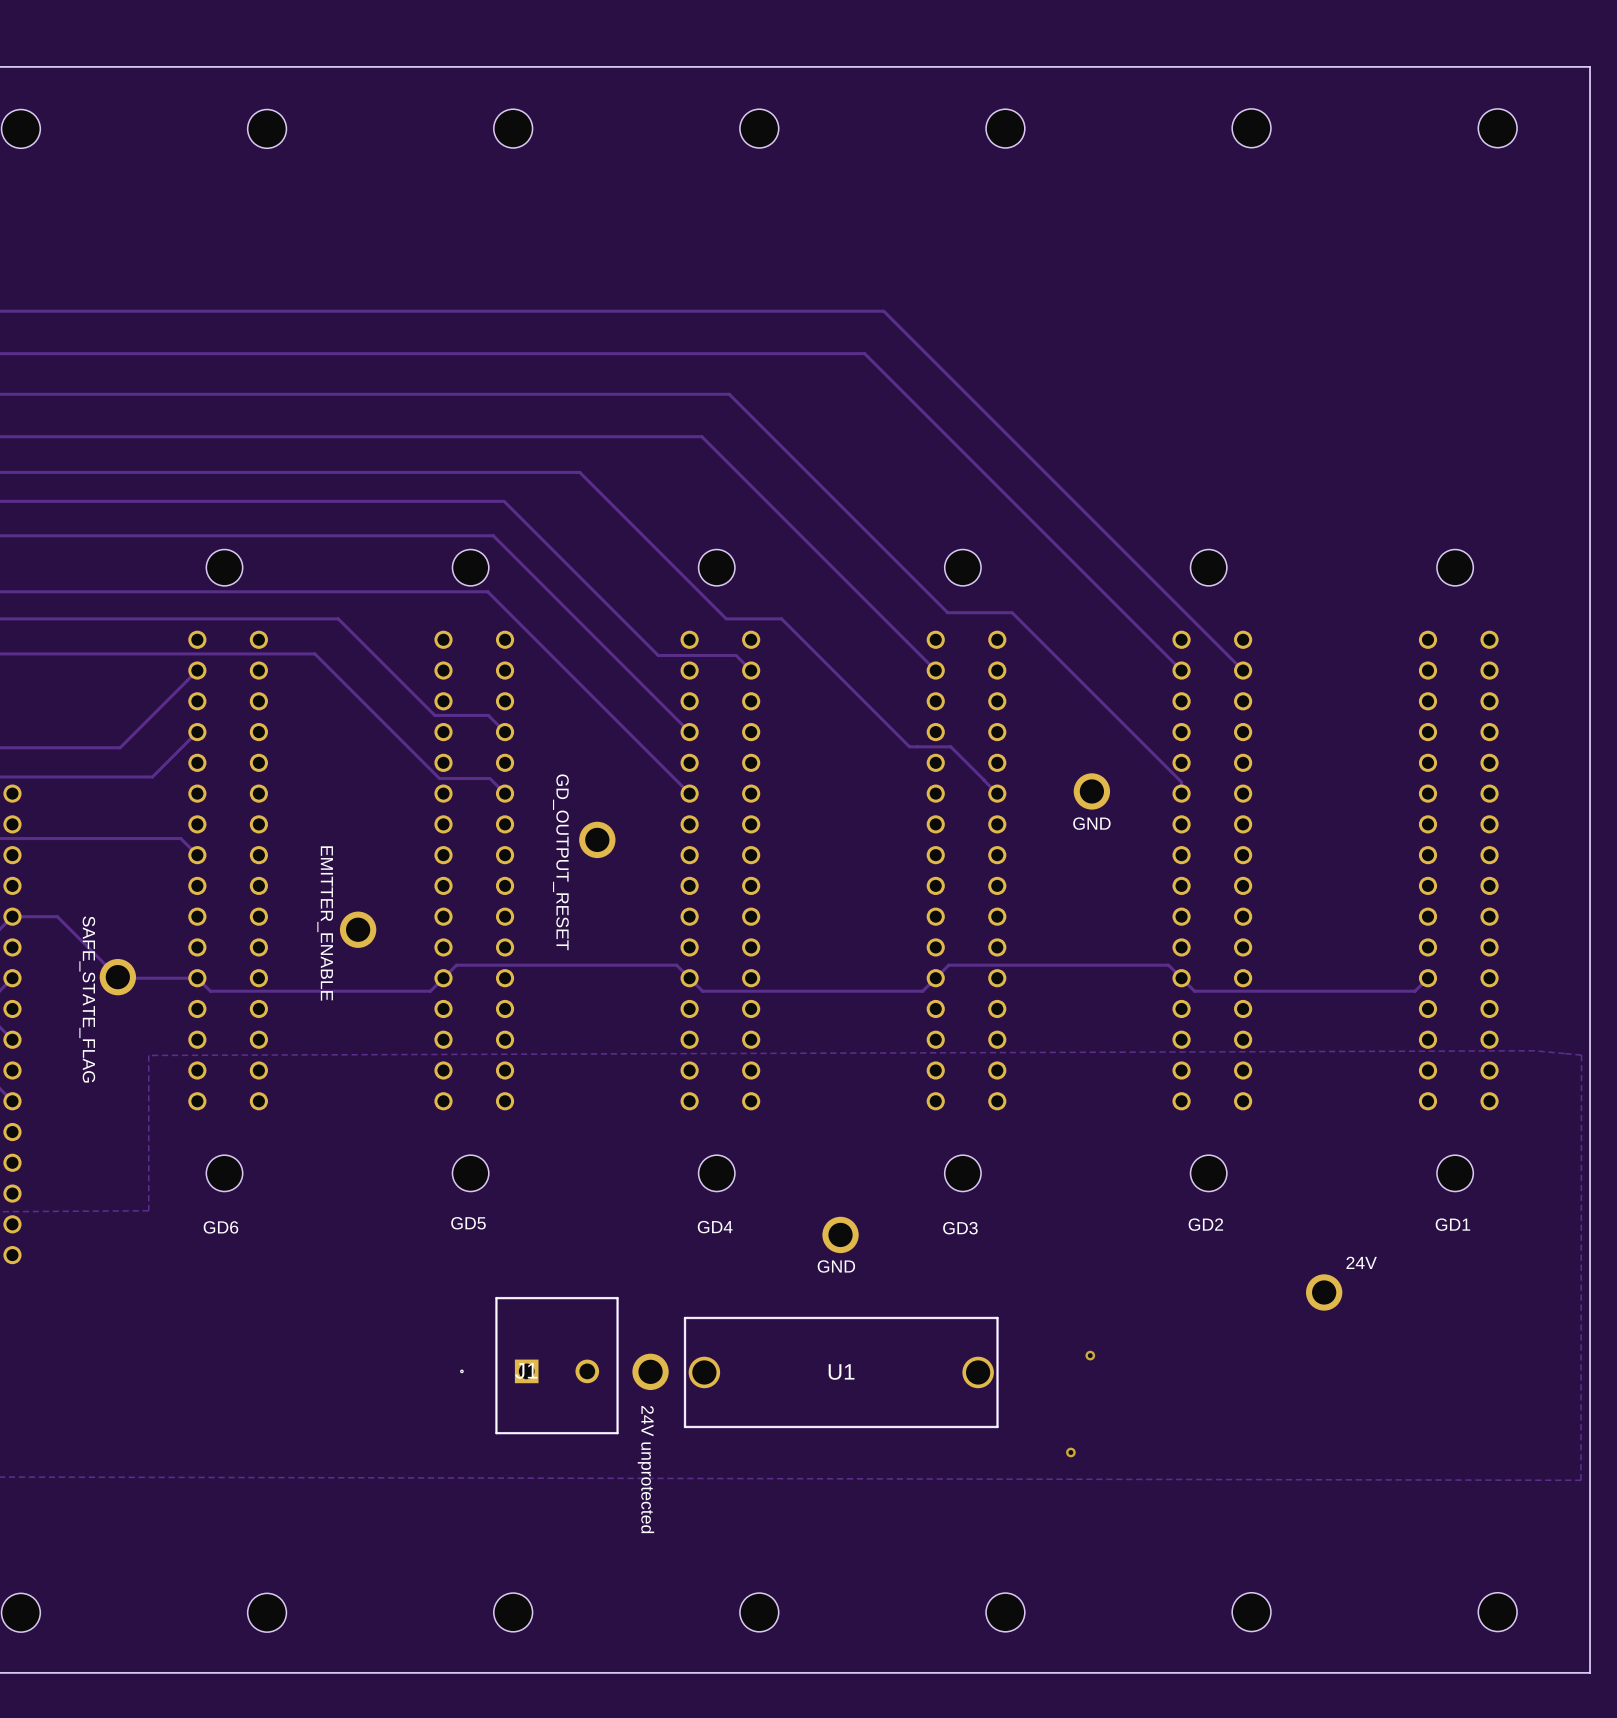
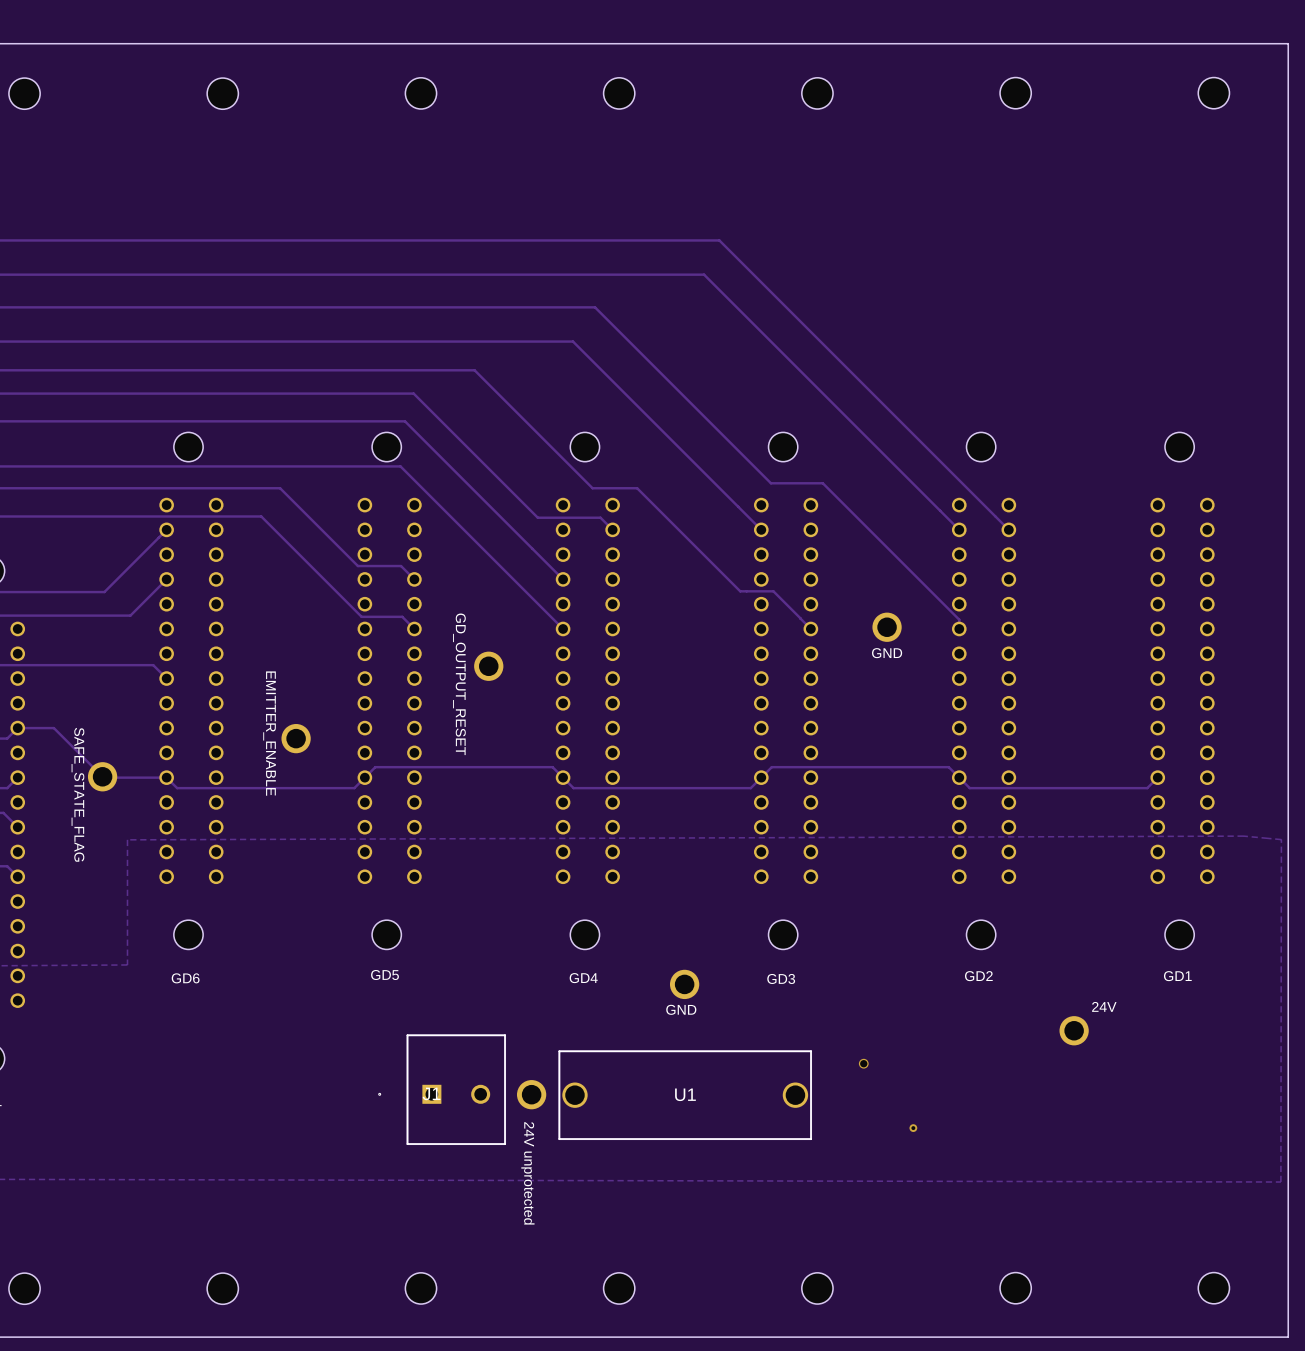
via: none -> (863, 1063)
via: (1090, 1355) -> none
via: none -> (913, 1128)
via: (1070, 1452) -> none

